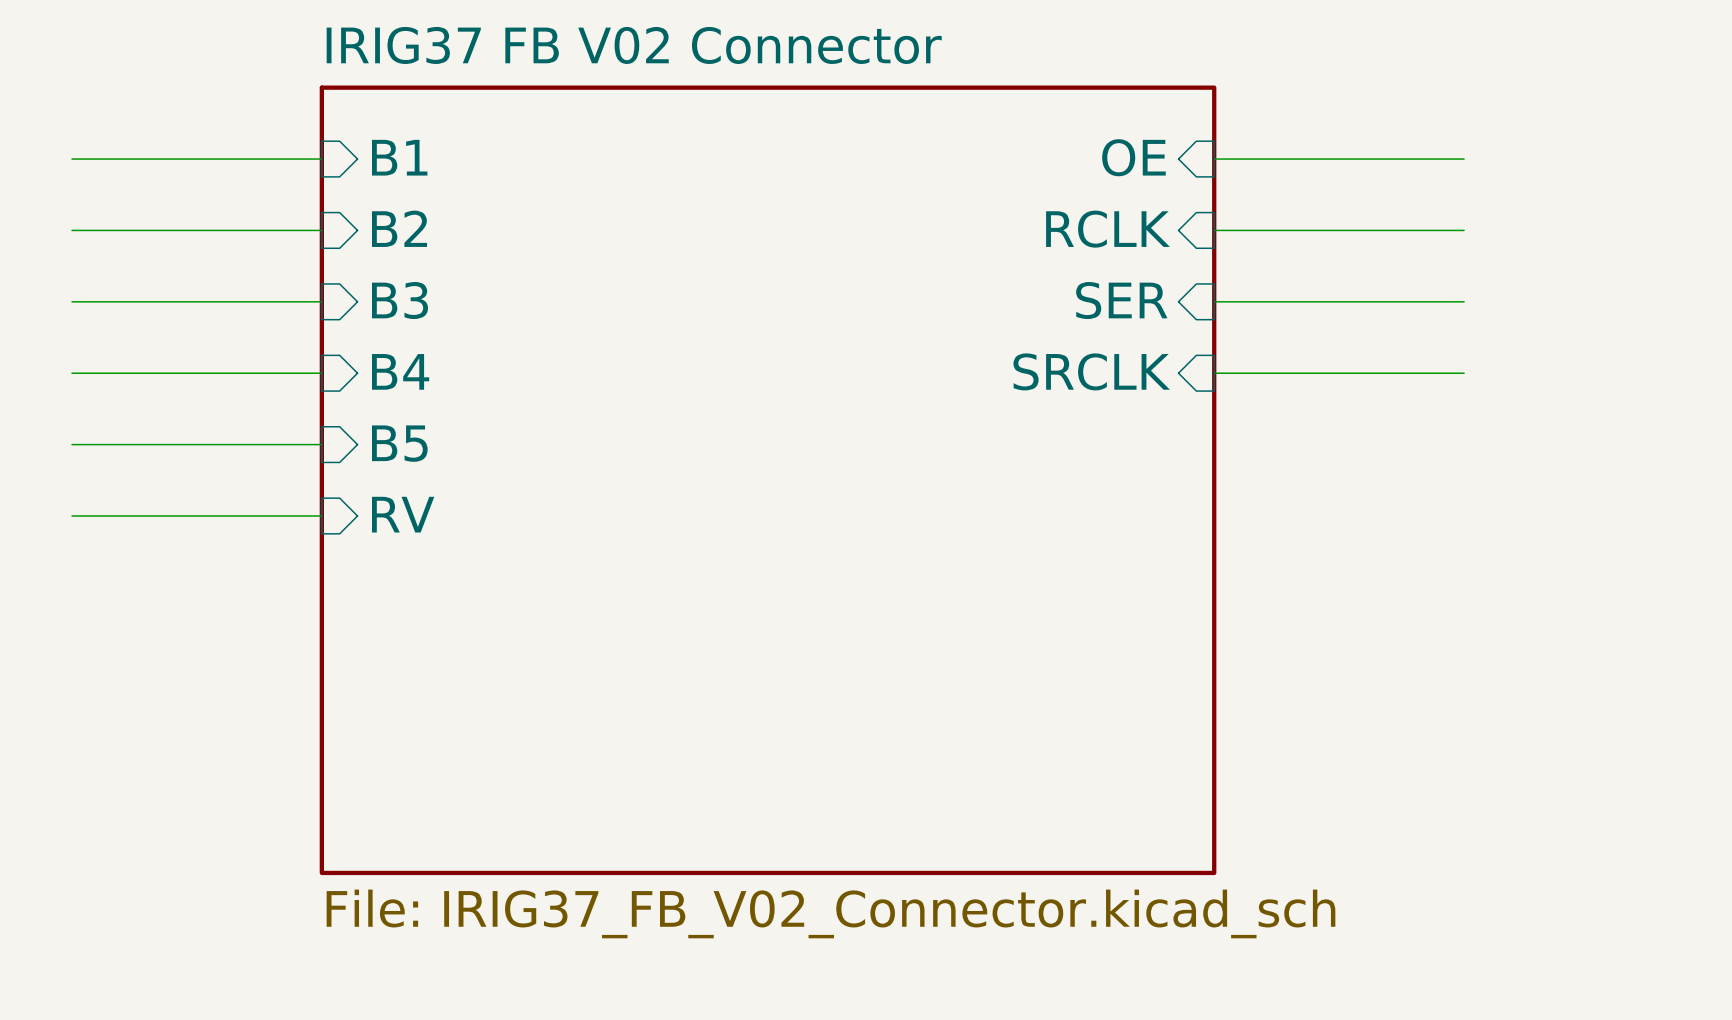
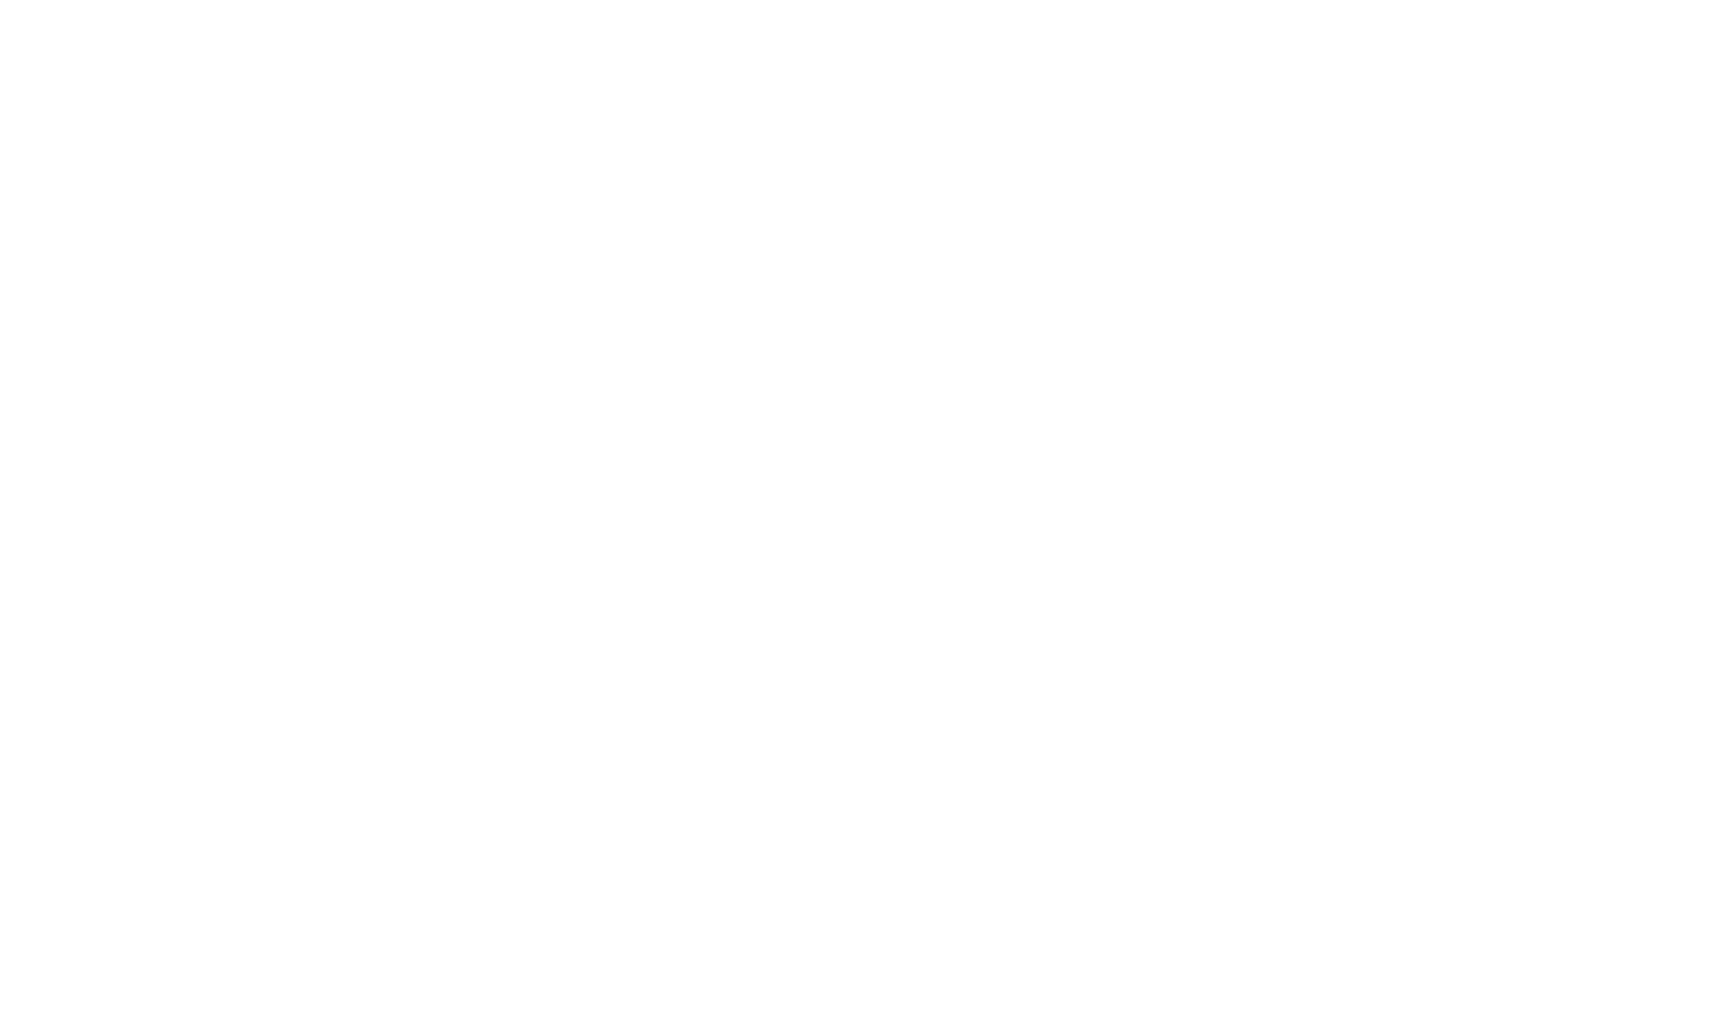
sheet pin: B1 (399, 157) -> none
sheet pin: OE (1133, 157) -> none
wire: (71, 159) (321, 159) -> none
wire: (1214, 159) (1464, 159) -> none
sheet pin: B2 (399, 228) -> none
sheet pin: RCLK (1108, 229) -> none
wire: (71, 230) (321, 230) -> none
wire: (1214, 230) (1464, 230) -> none
sheet pin: B3 (400, 300) -> none
sheet pin: SER (1121, 300) -> none
wire: (71, 301) (321, 301) -> none
wire: (1214, 301) (1464, 301) -> none
sheet pin: B4 (400, 371) -> none
sheet pin: SRCLK (1091, 371) -> none
wire: (71, 373) (321, 373) -> none
wire: (1214, 373) (1464, 373) -> none
sheet pin: B5 (399, 443) -> none
wire: (71, 444) (321, 444) -> none
sheet IRIG37 FB V02 Connector: File: IRIG37_FB_V02_Connector.kicad_sch (768, 480) -> none
sheet pin: RV (403, 514) -> none
wire: (71, 515) (321, 515) -> none

